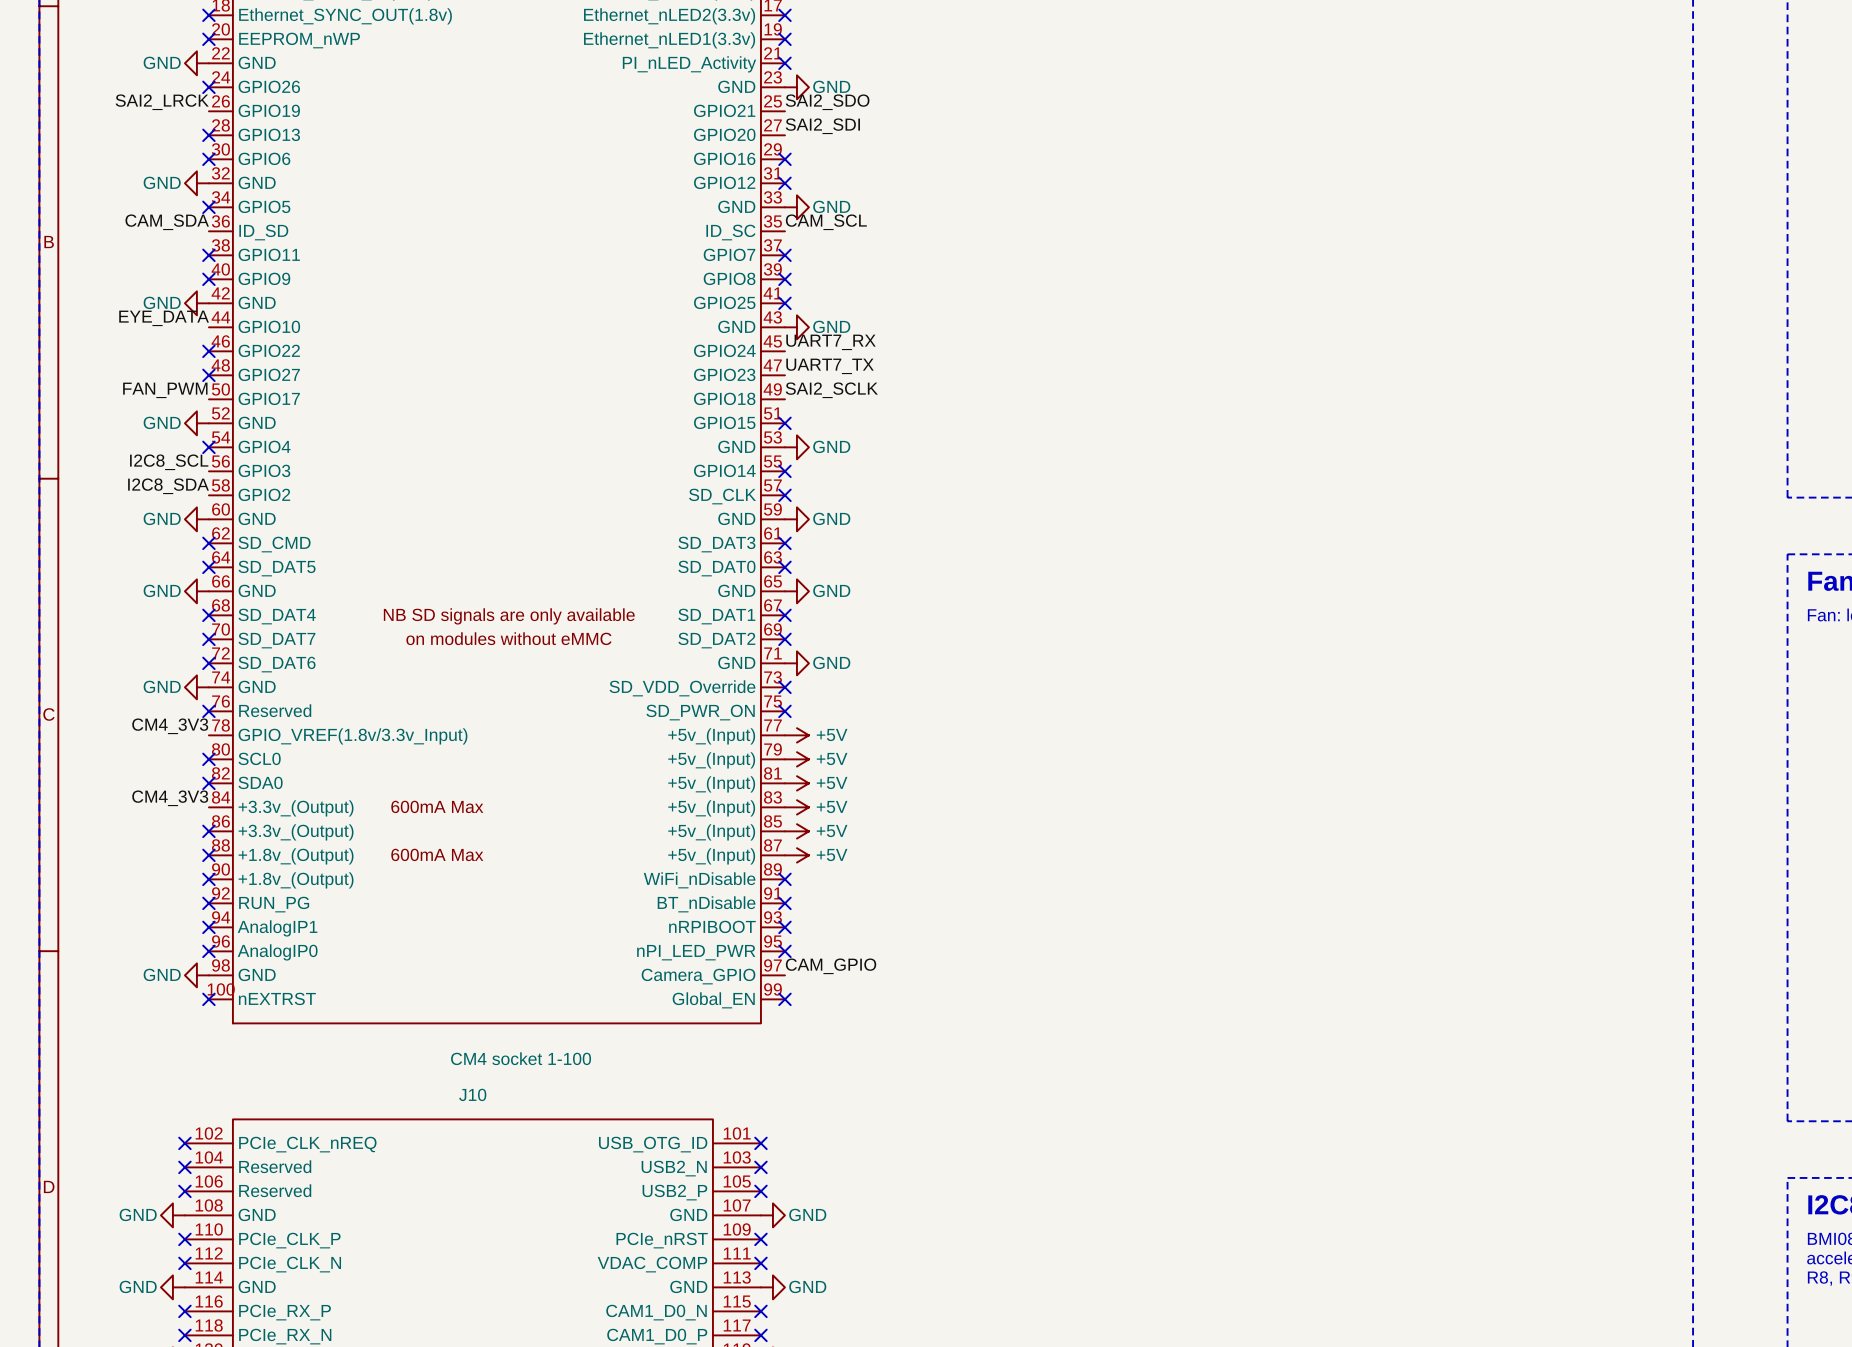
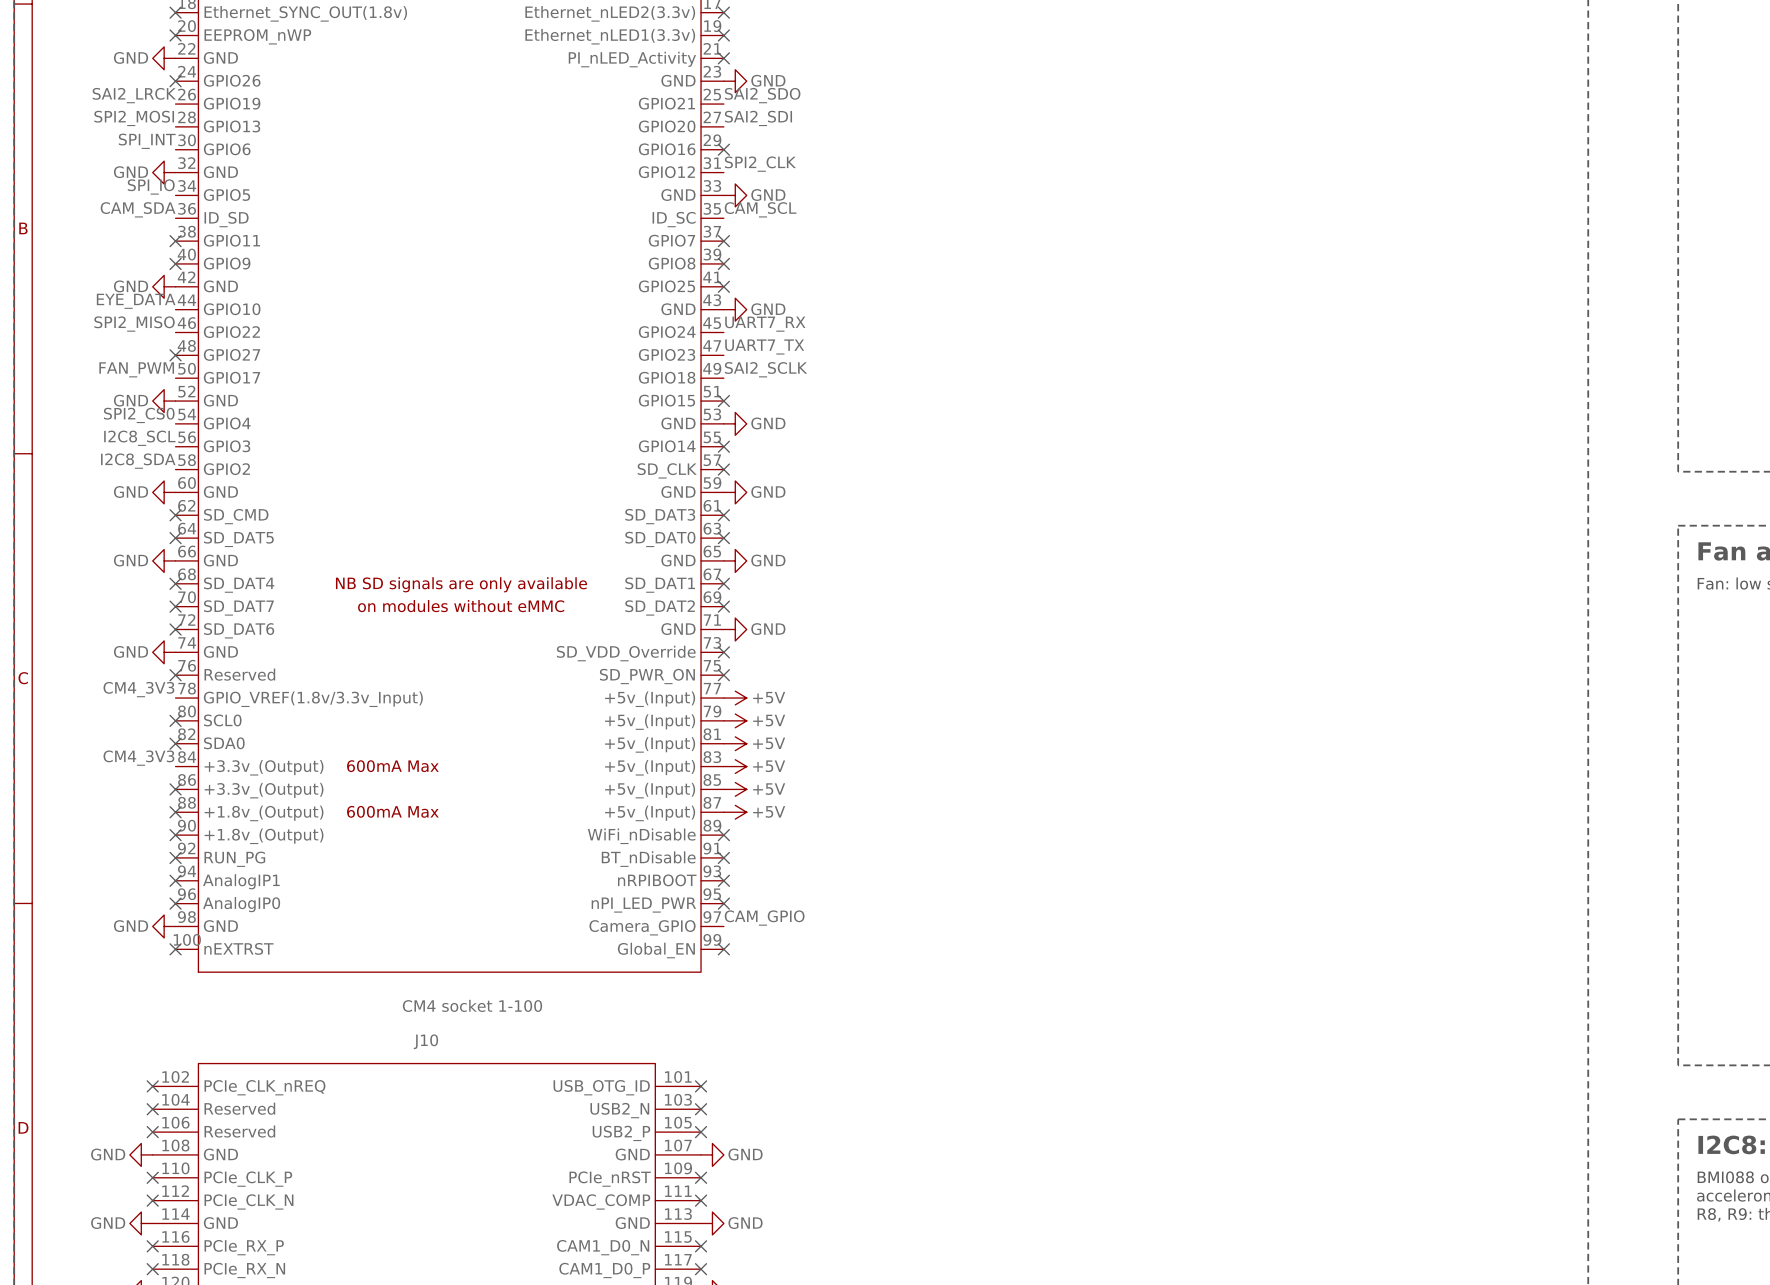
label: none -> SPI2_MOSI (134, 118)
no-connect mark: (208, 135) -> none
label: none -> SPI_INT (147, 141)
no-connect mark: (208, 159) -> none
label: none -> SPI2_CLK (760, 164)
no-connect mark: (784, 183) -> none
label: none -> SPI_IO (151, 186)
no-connect mark: (208, 207) -> none
label: none -> SPI2_MISO (134, 324)
no-connect mark: (208, 351) -> none
label: none -> SPI2_CS0 (139, 415)
no-connect mark: (208, 447) -> none

